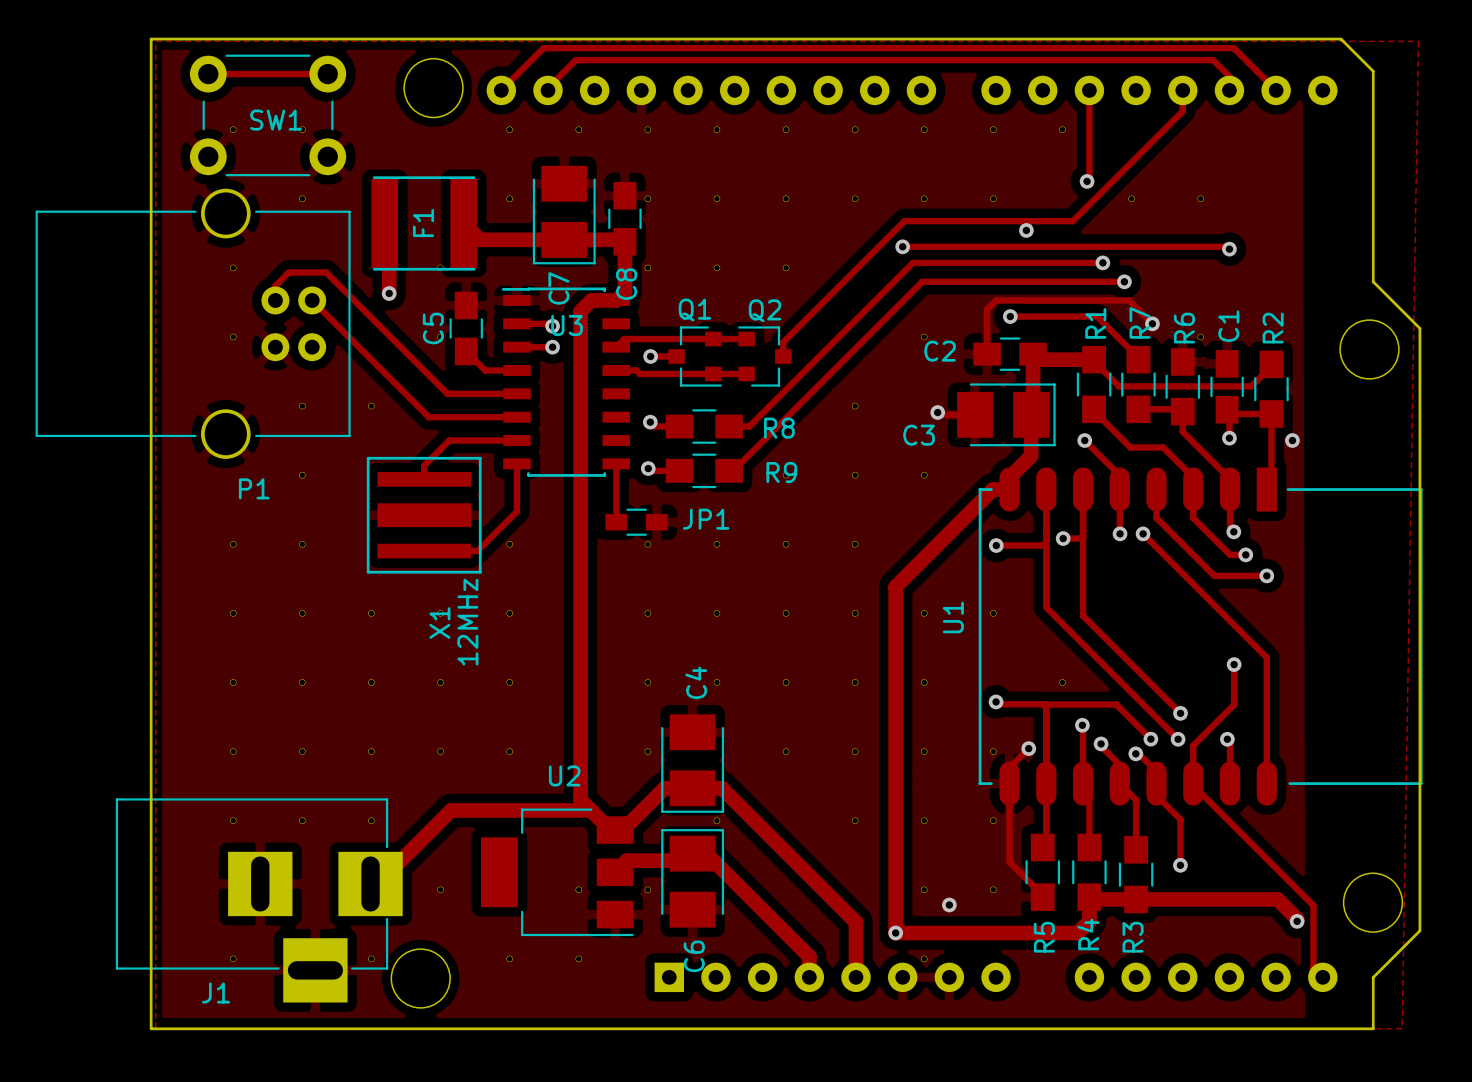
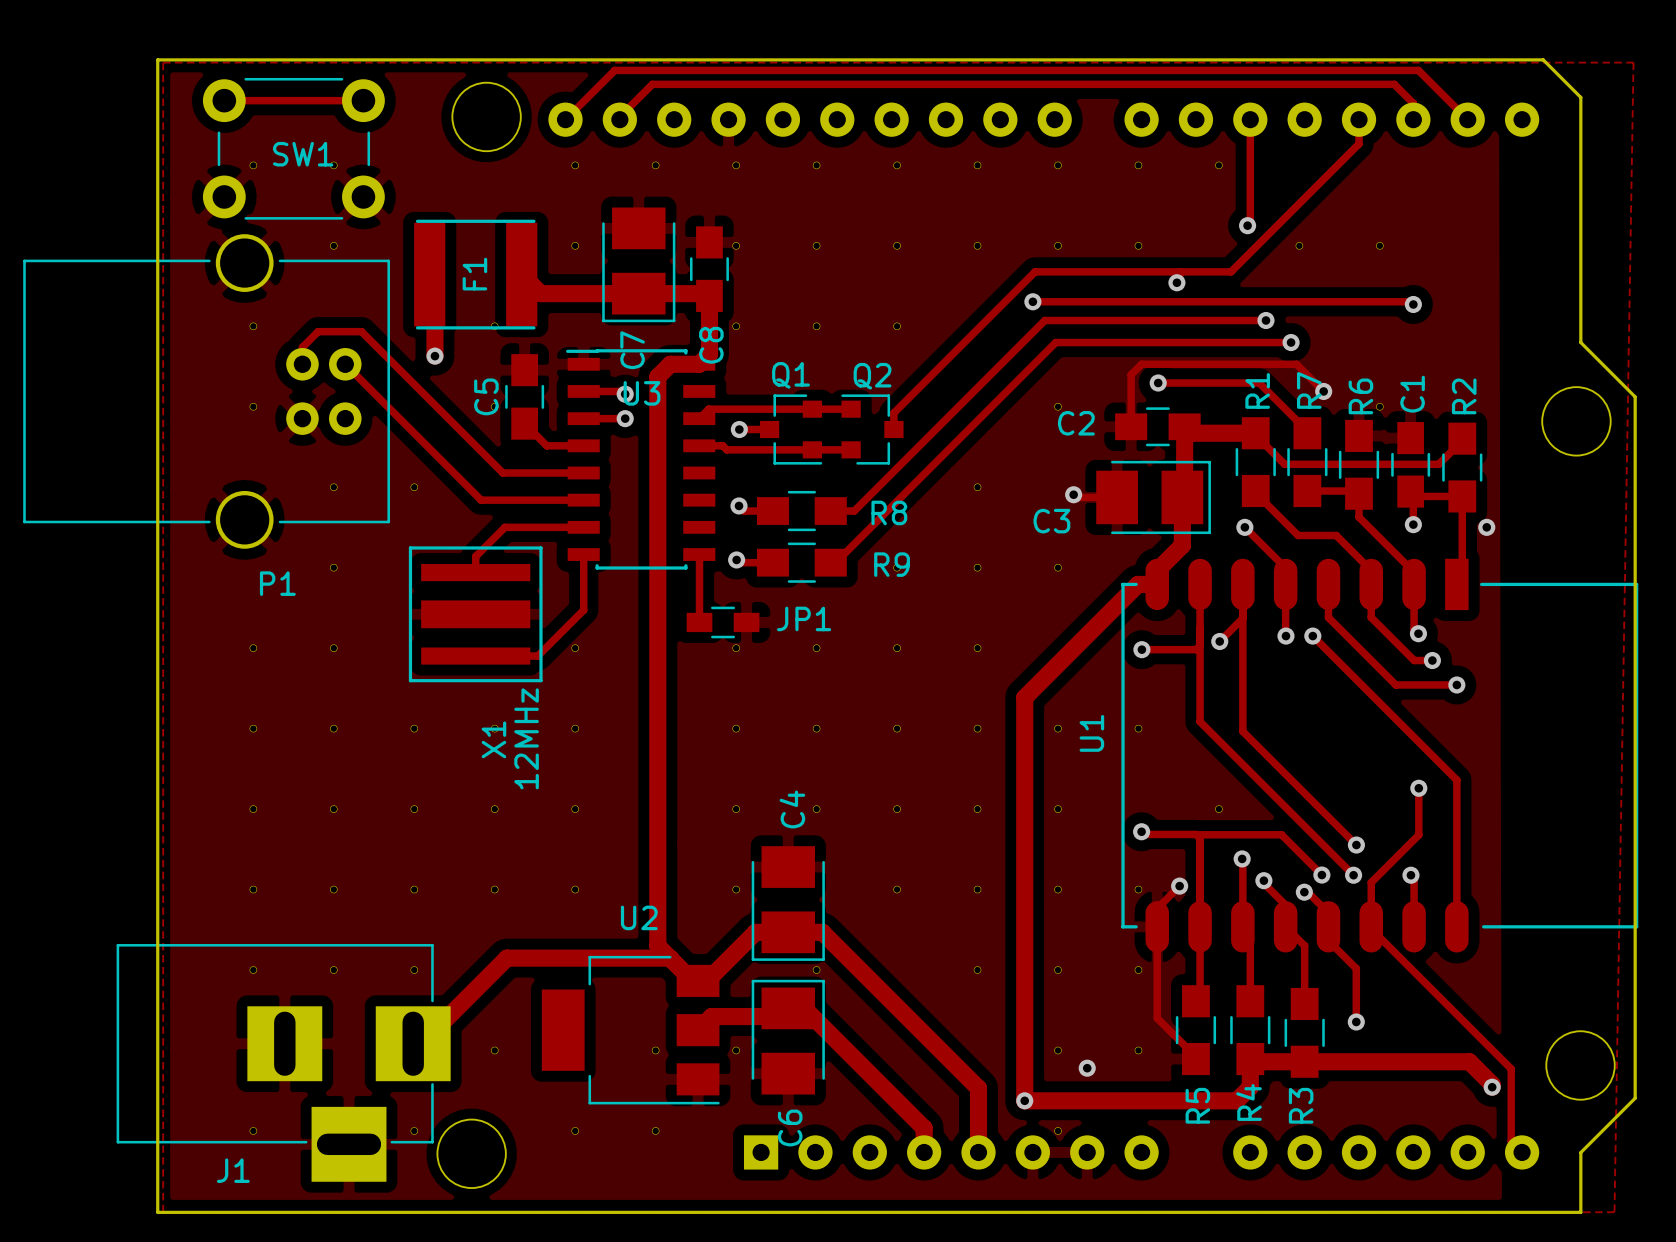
track: (1083, 537) (1063, 538) -> (1242, 618) (1219, 641)

